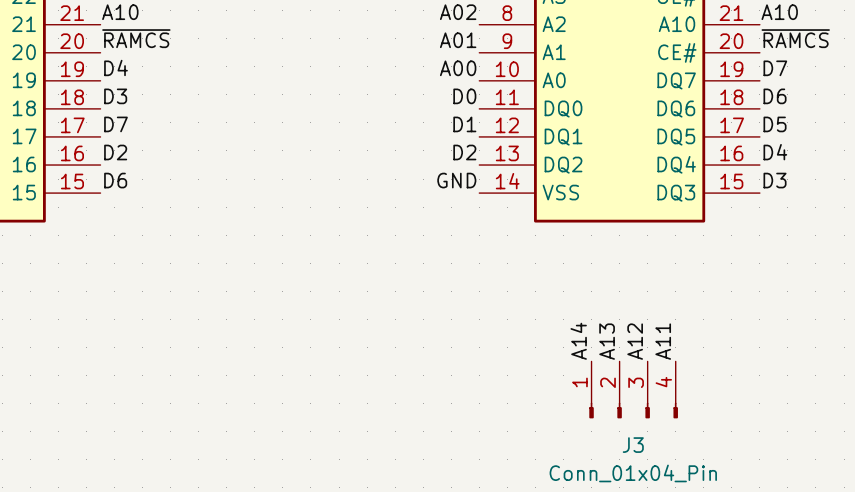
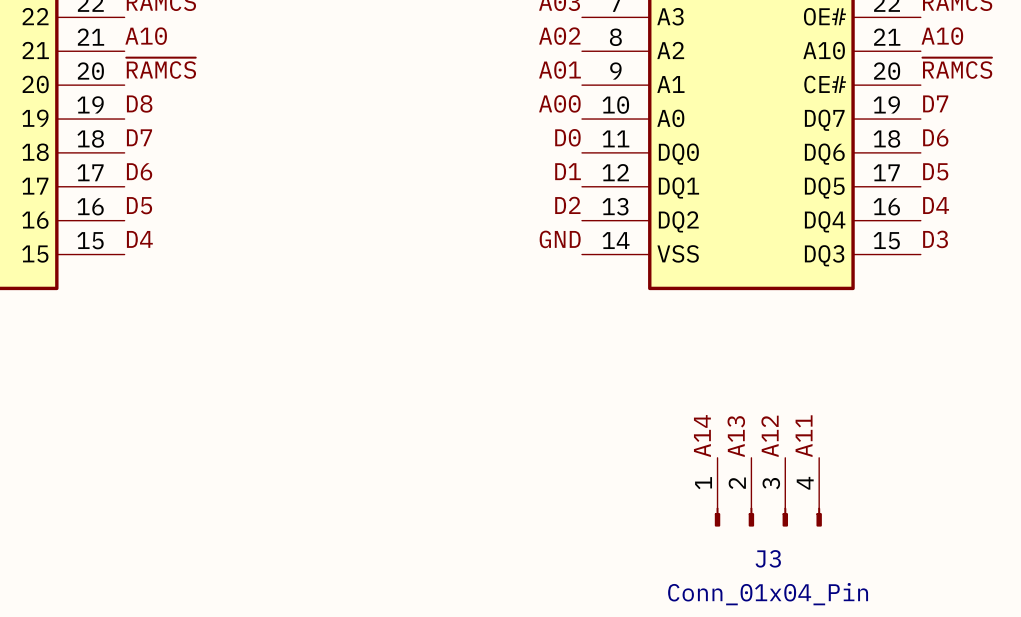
label: D4 (115, 67) -> D8 (139, 103)
label: D3 (115, 96) -> D7 (139, 137)
label: D7 (115, 124) -> D6 (139, 171)
label: D2 (115, 152) -> D5 (139, 205)
label: D6 (115, 180) -> D4 (139, 239)

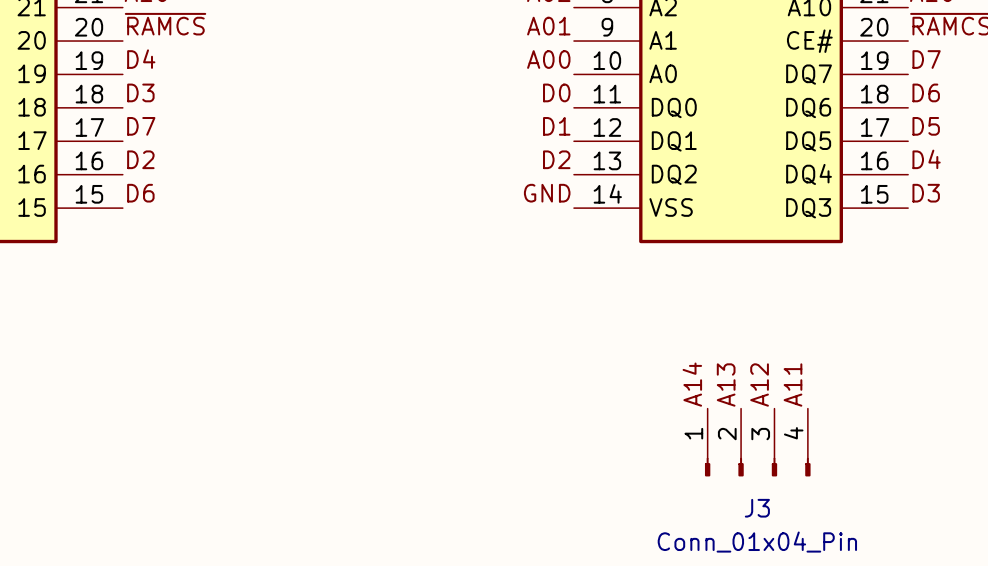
label: D8 (139, 103) -> D4 (141, 59)
label: D7 (139, 137) -> D3 (140, 92)
label: D6 (139, 171) -> D7 (141, 126)
label: D5 (139, 205) -> D2 (140, 159)
label: D4 (139, 239) -> D6 (140, 193)

